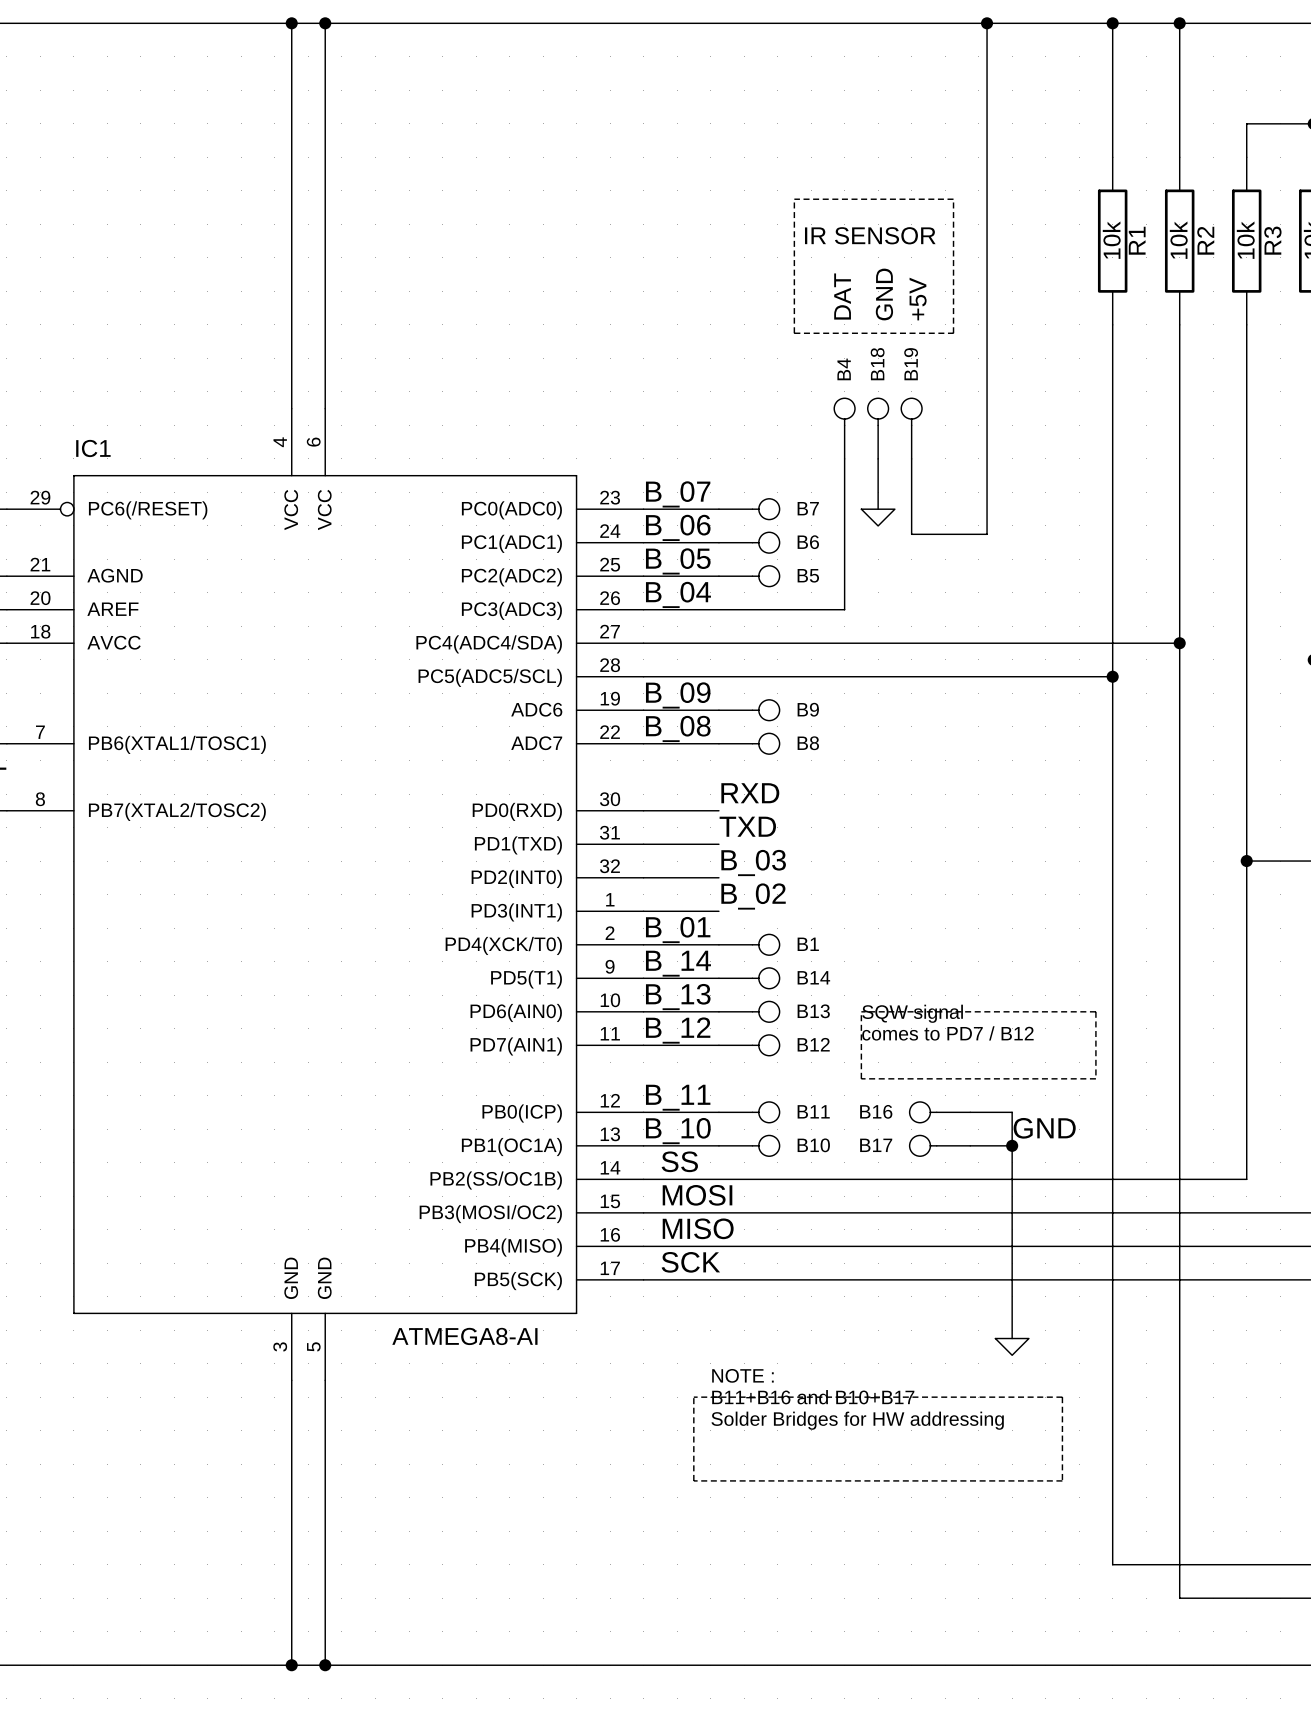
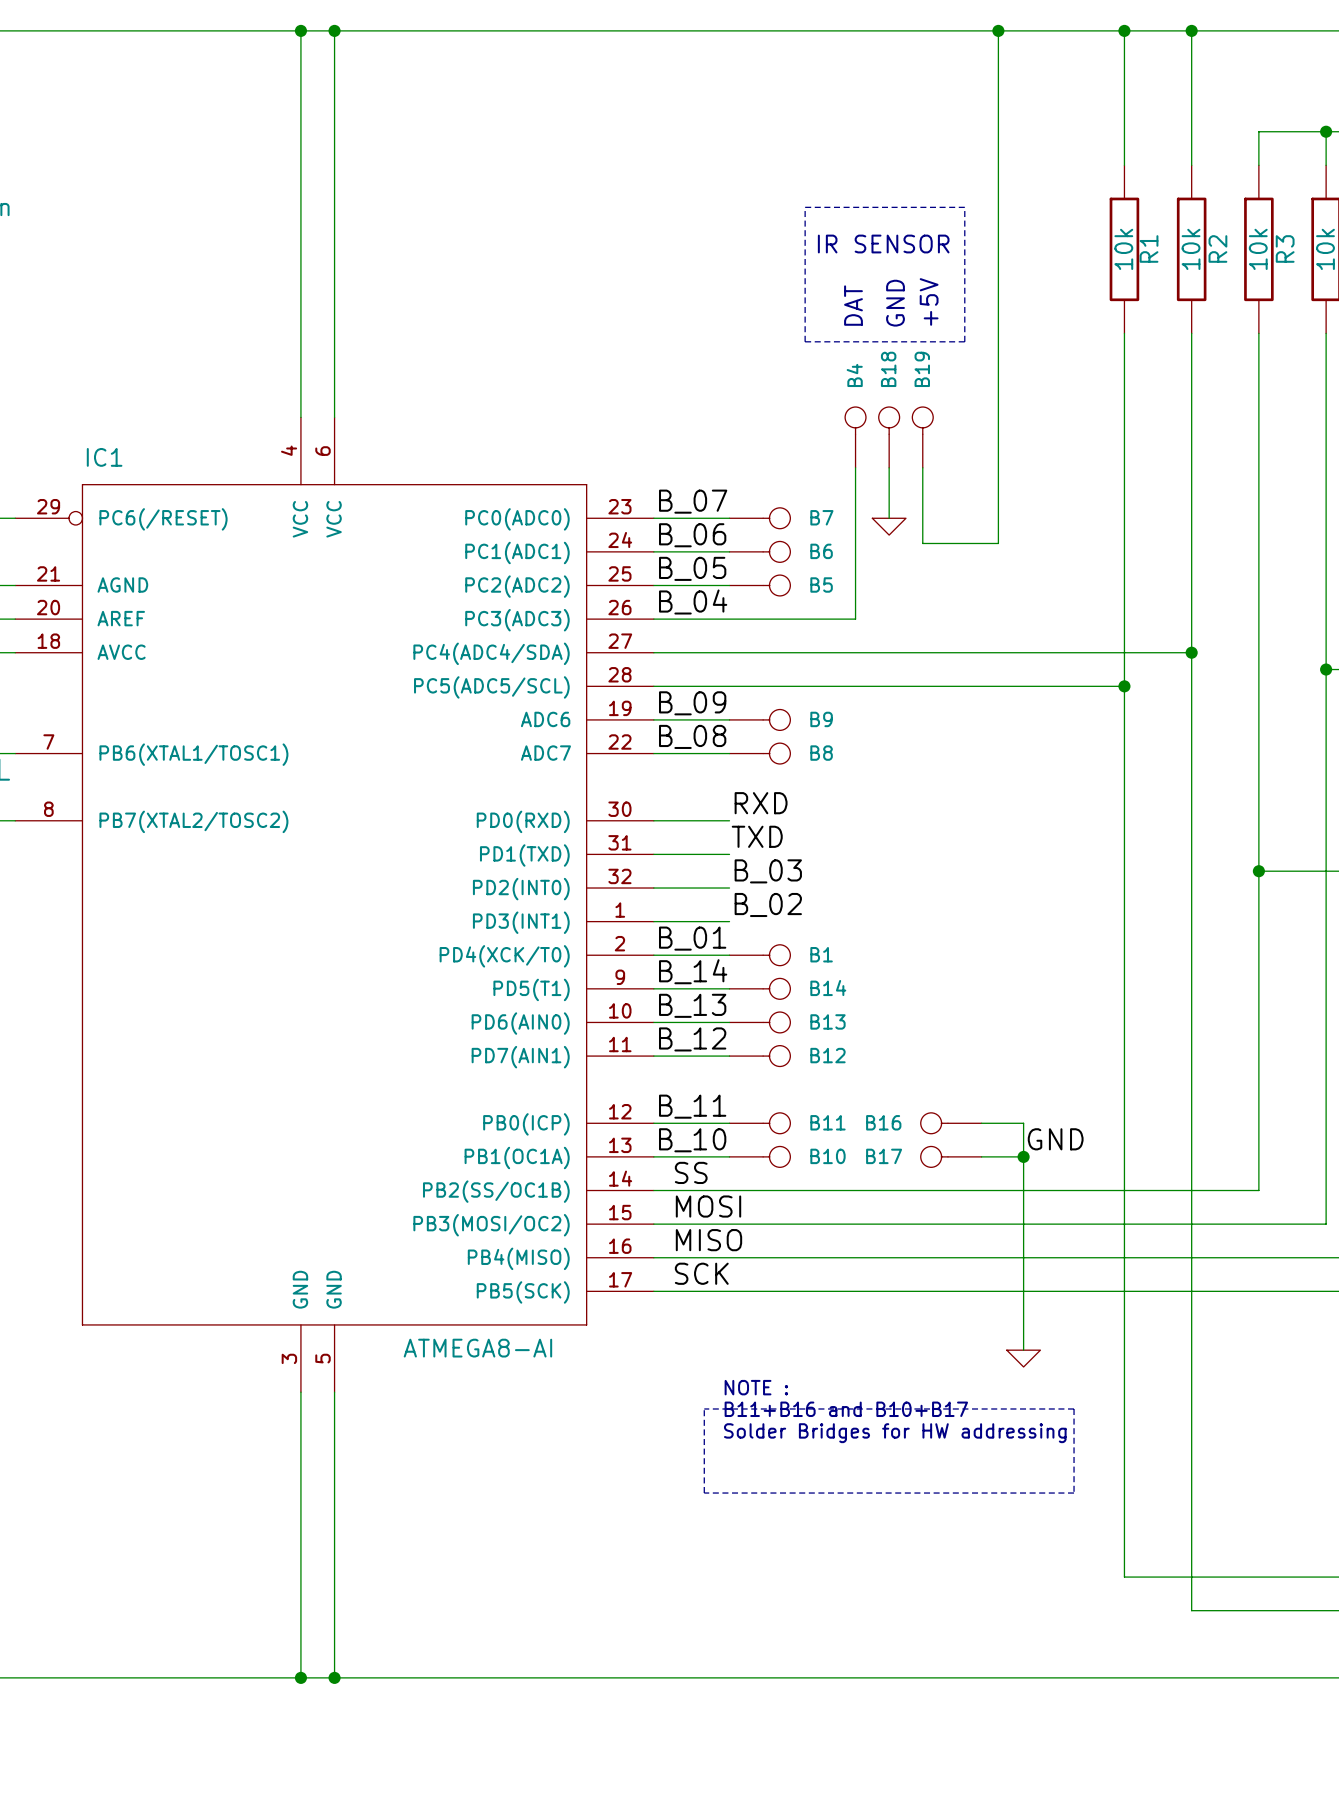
line: (861, 1011) (1095, 1011) (1095, 1078) (861, 1078) (861, 1011) -> none
text: SQW signal (912, 1013) -> none
text: comes to PD7 / B12 (947, 1033) -> none

